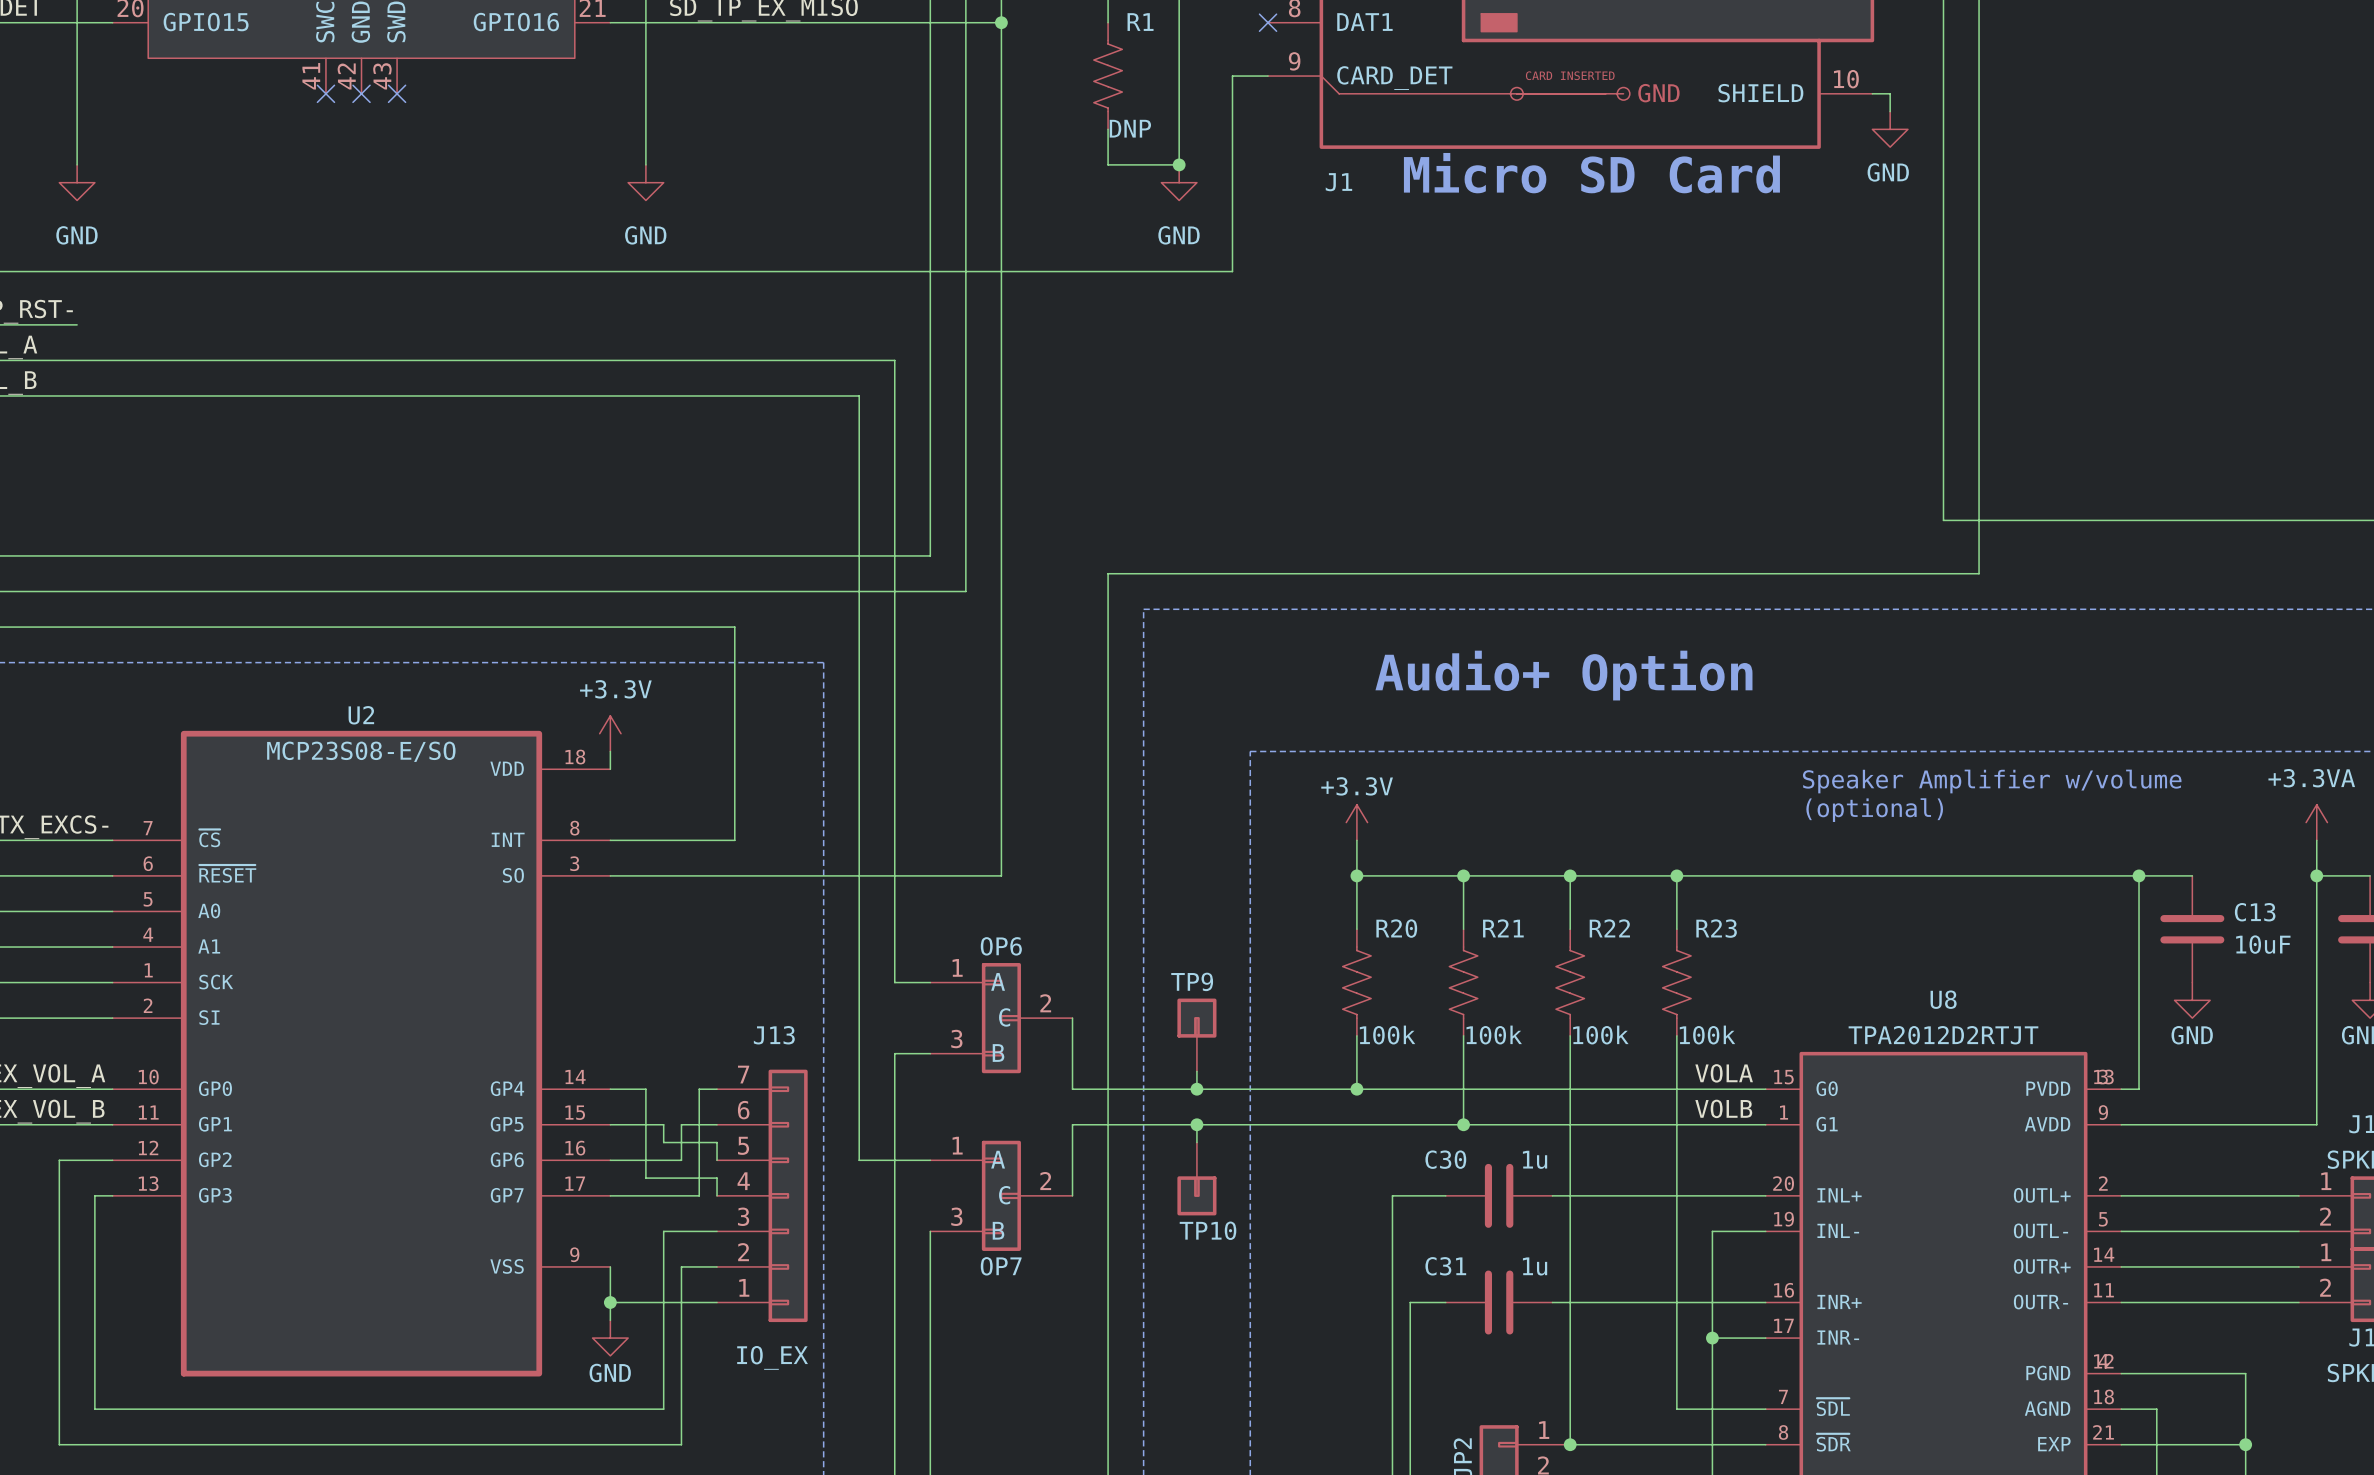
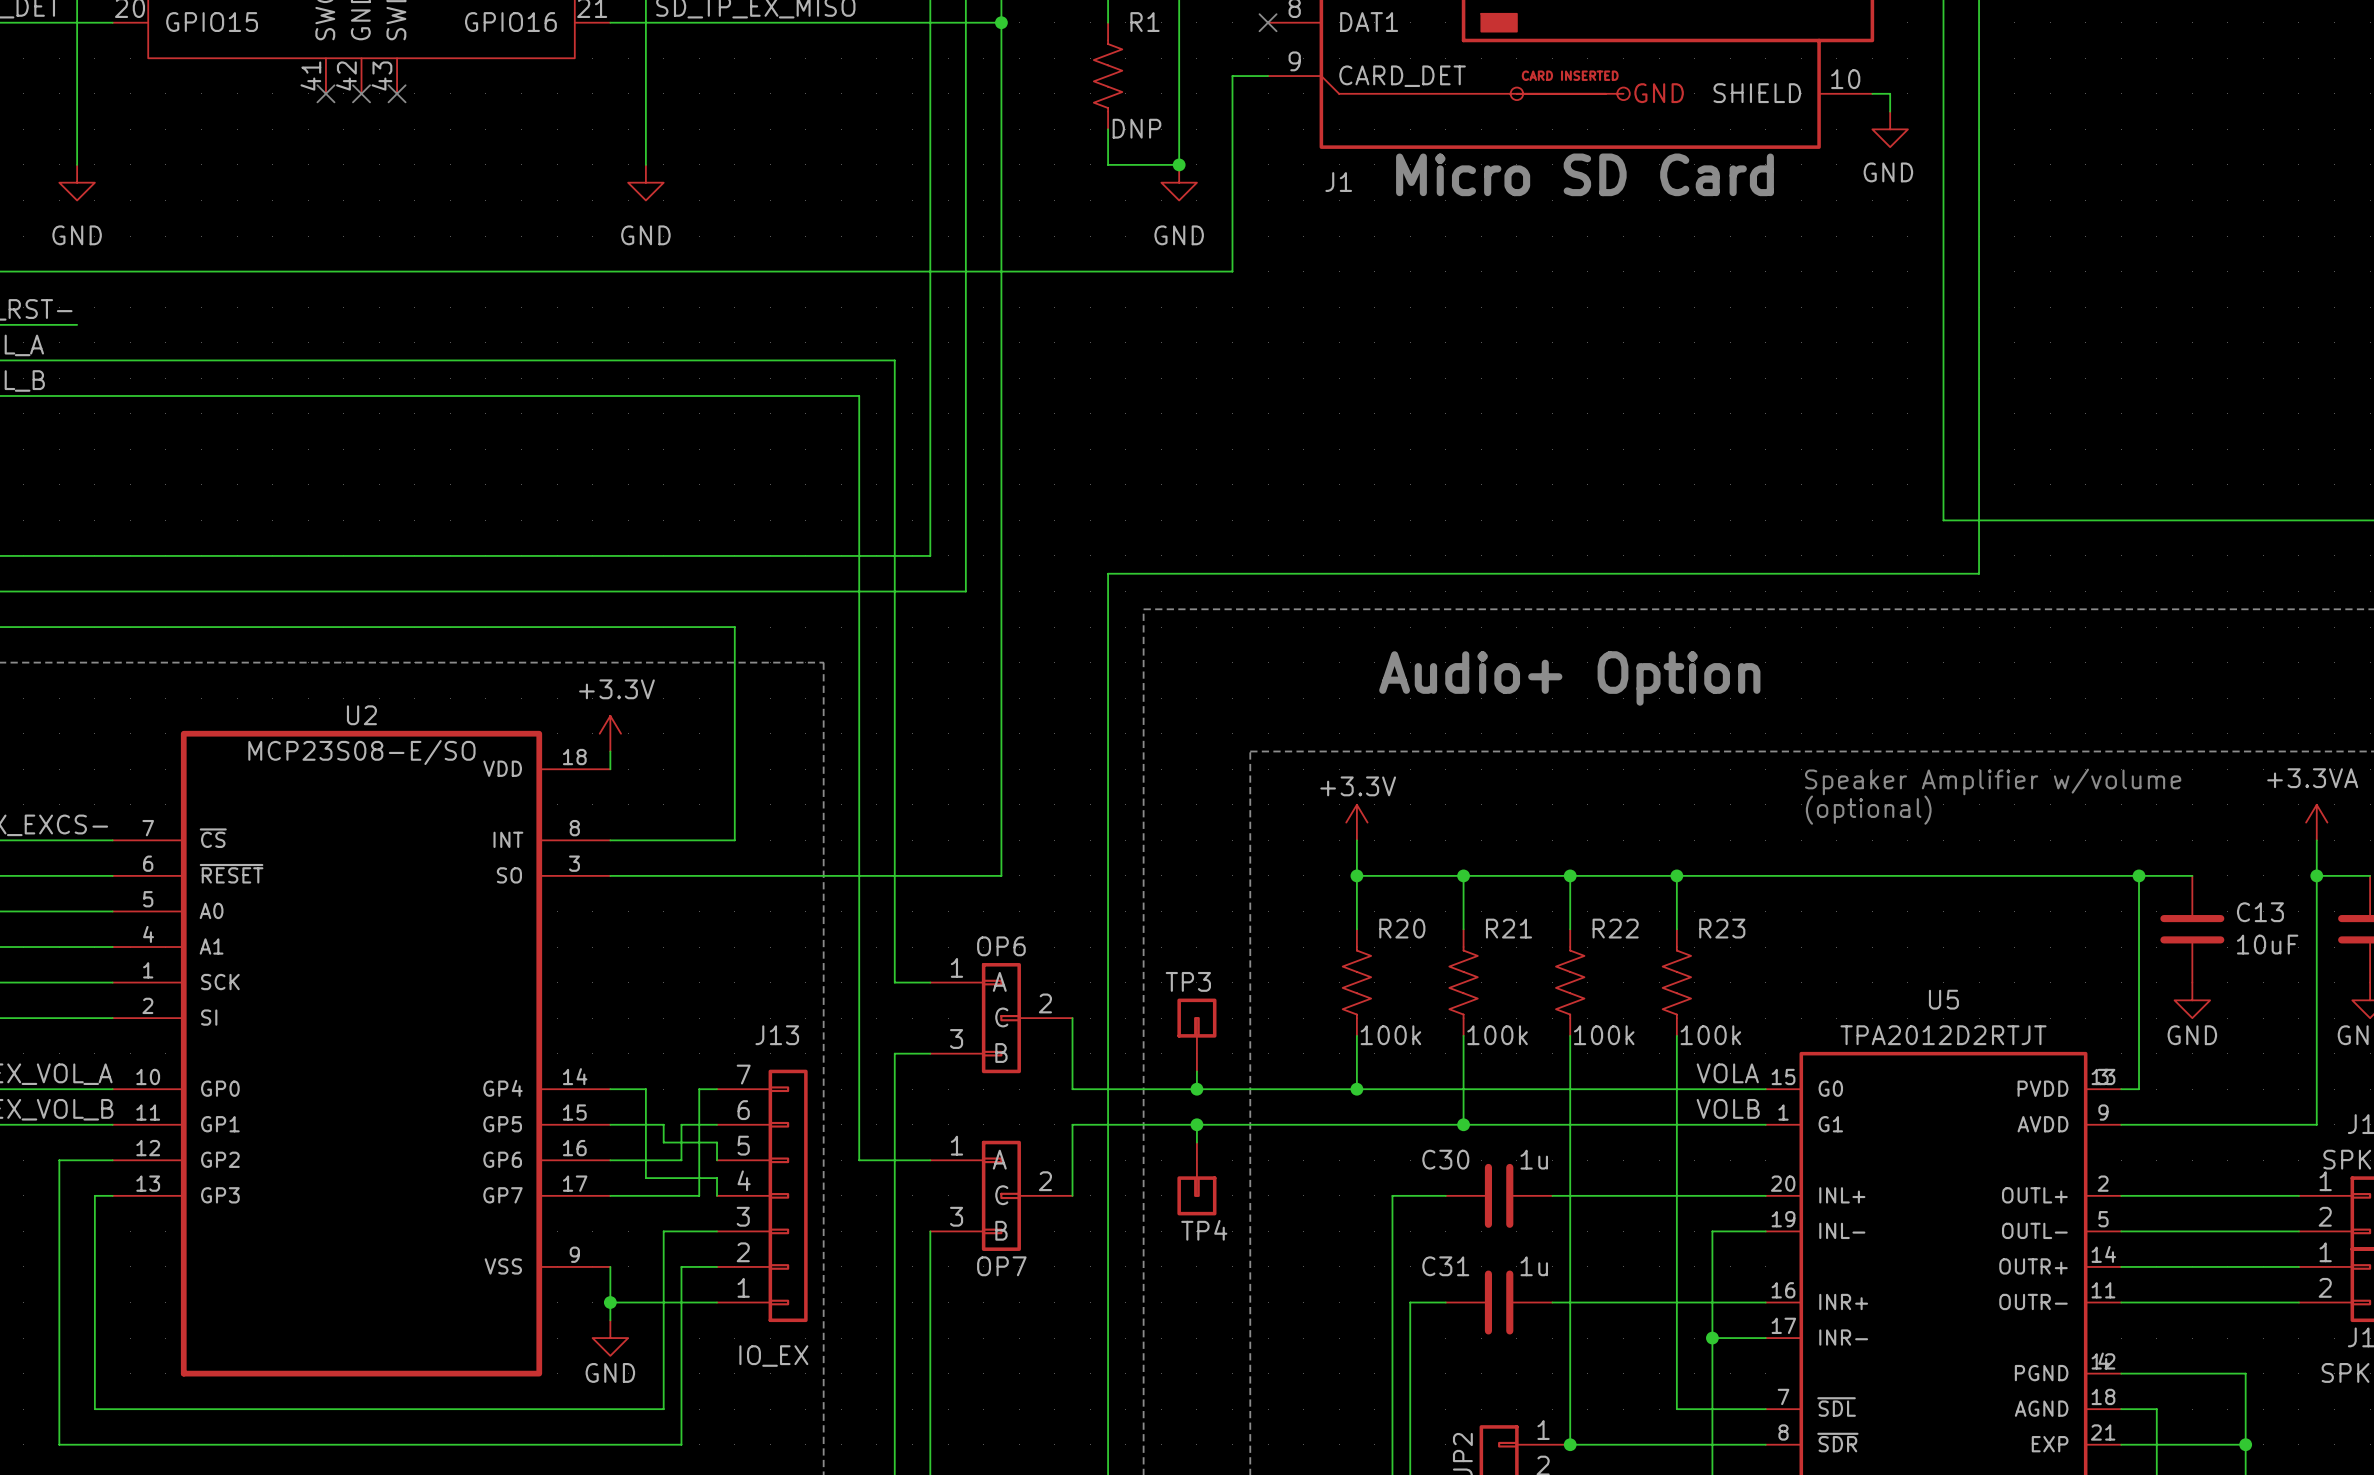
TP9 name: TP9 (1192, 981) -> TP3 (1188, 981)
U8 name: U8 (1943, 999) -> U5 (1943, 999)
TP10 name: TP10 (1208, 1230) -> TP4 (1204, 1230)

